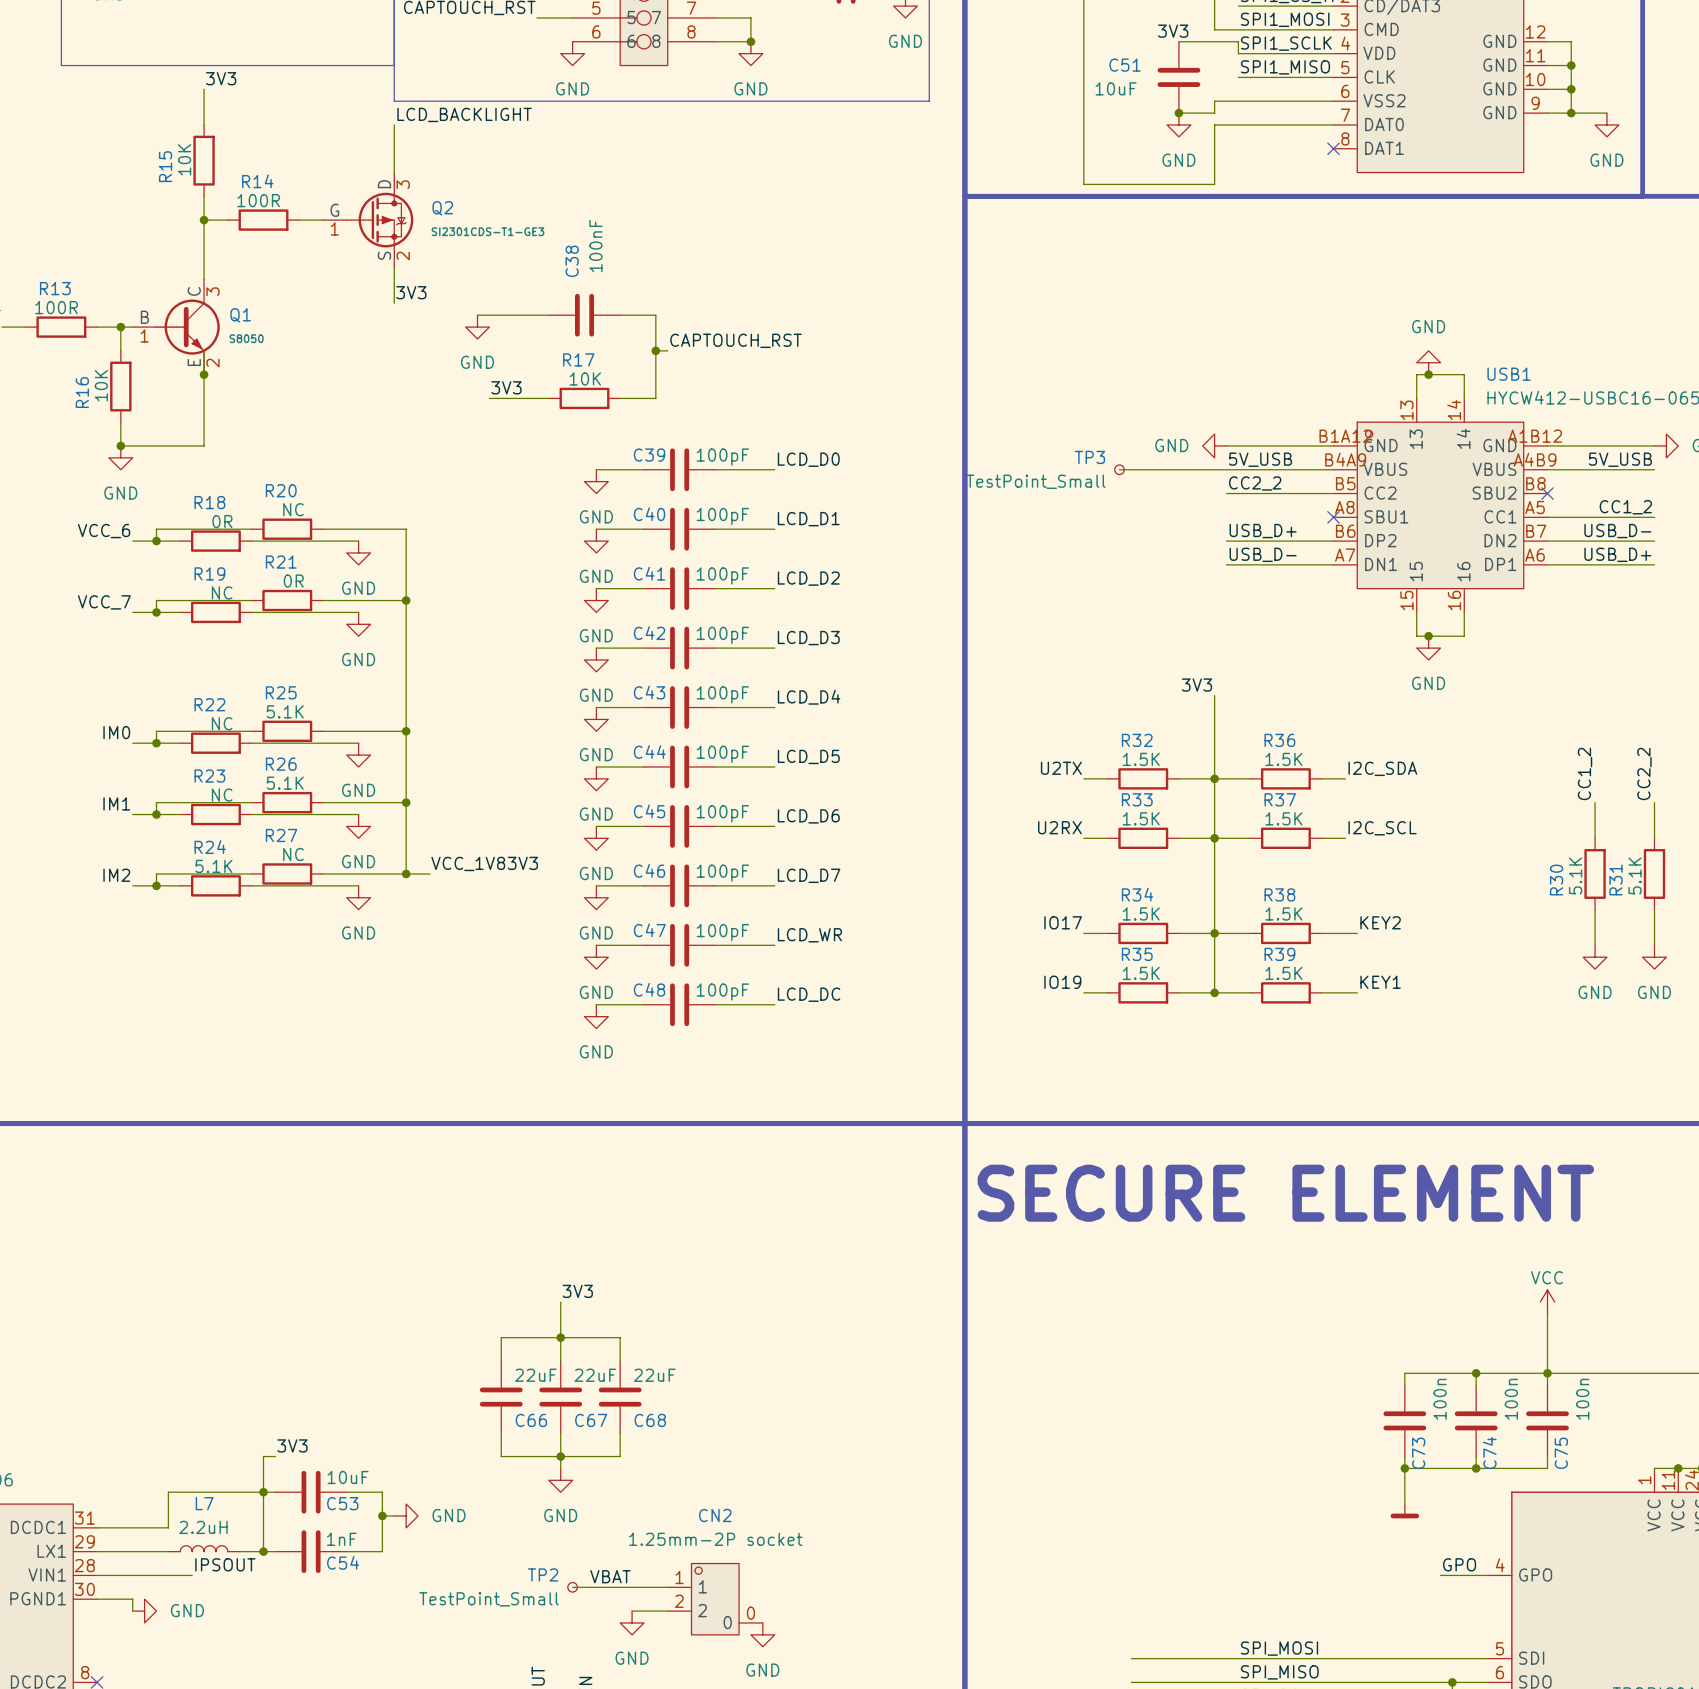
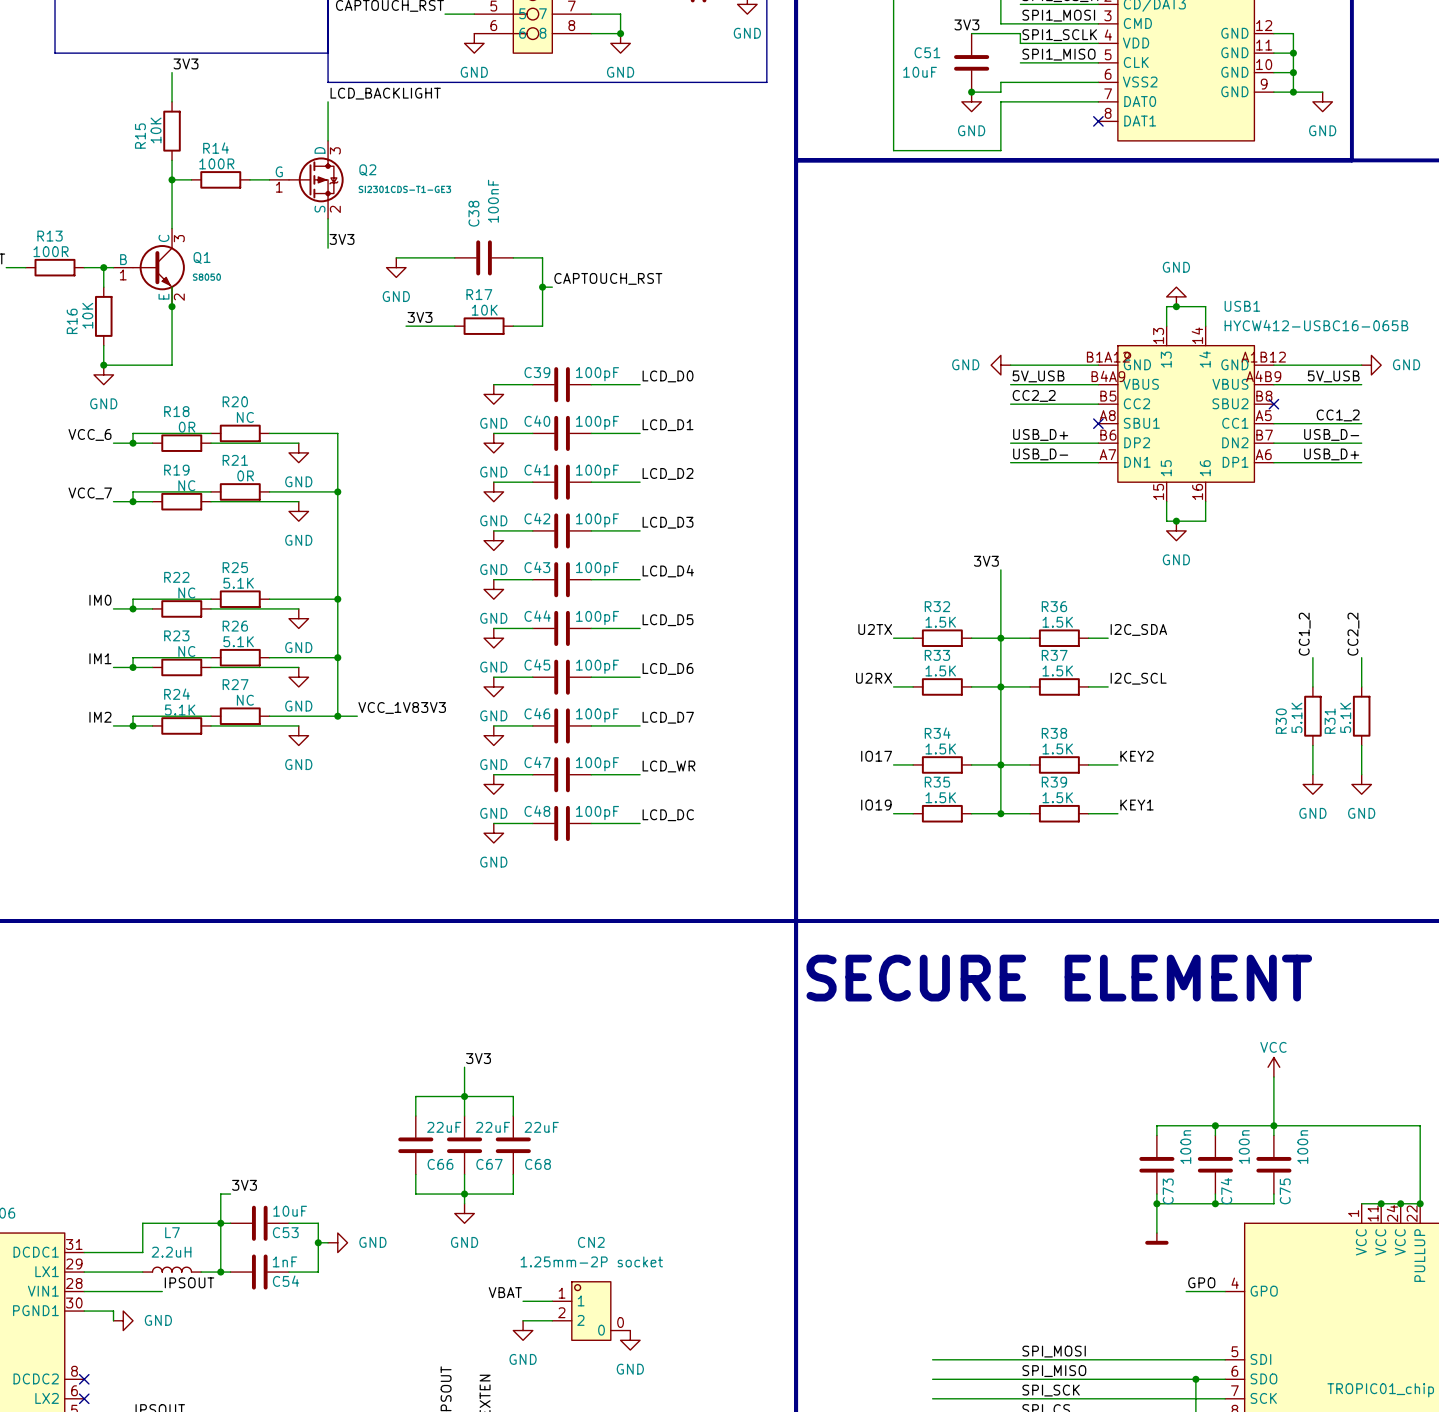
wire: (1119, 469) (1226, 469) -> none
TP3: TestPoint_Small (1119, 469) -> none
wire: (572, 1587) (632, 1587) -> none
TP2: TestPoint_Small (572, 1587) -> none

